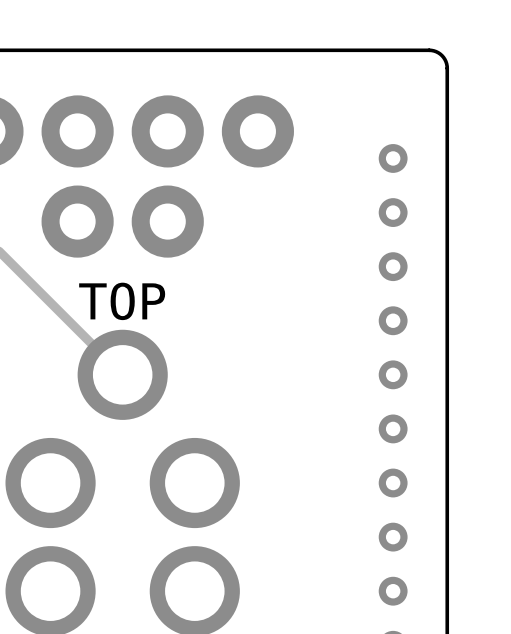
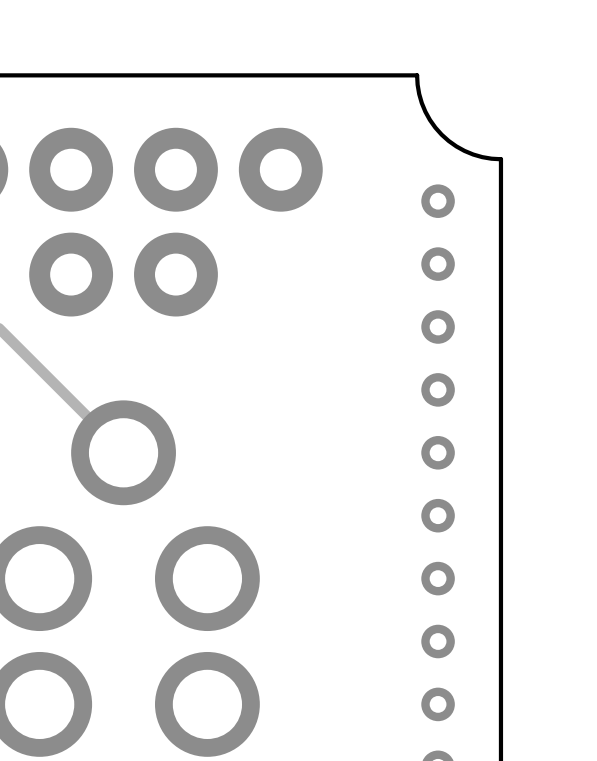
board edge: (375, 50) (431, 50) (441, 55) (447, 65) (447, 122) -> (417, 75) (419, 94) (425, 111) (441, 134) (456, 146) (473, 154) (500, 159)
text: TOP (122, 301) -> none

